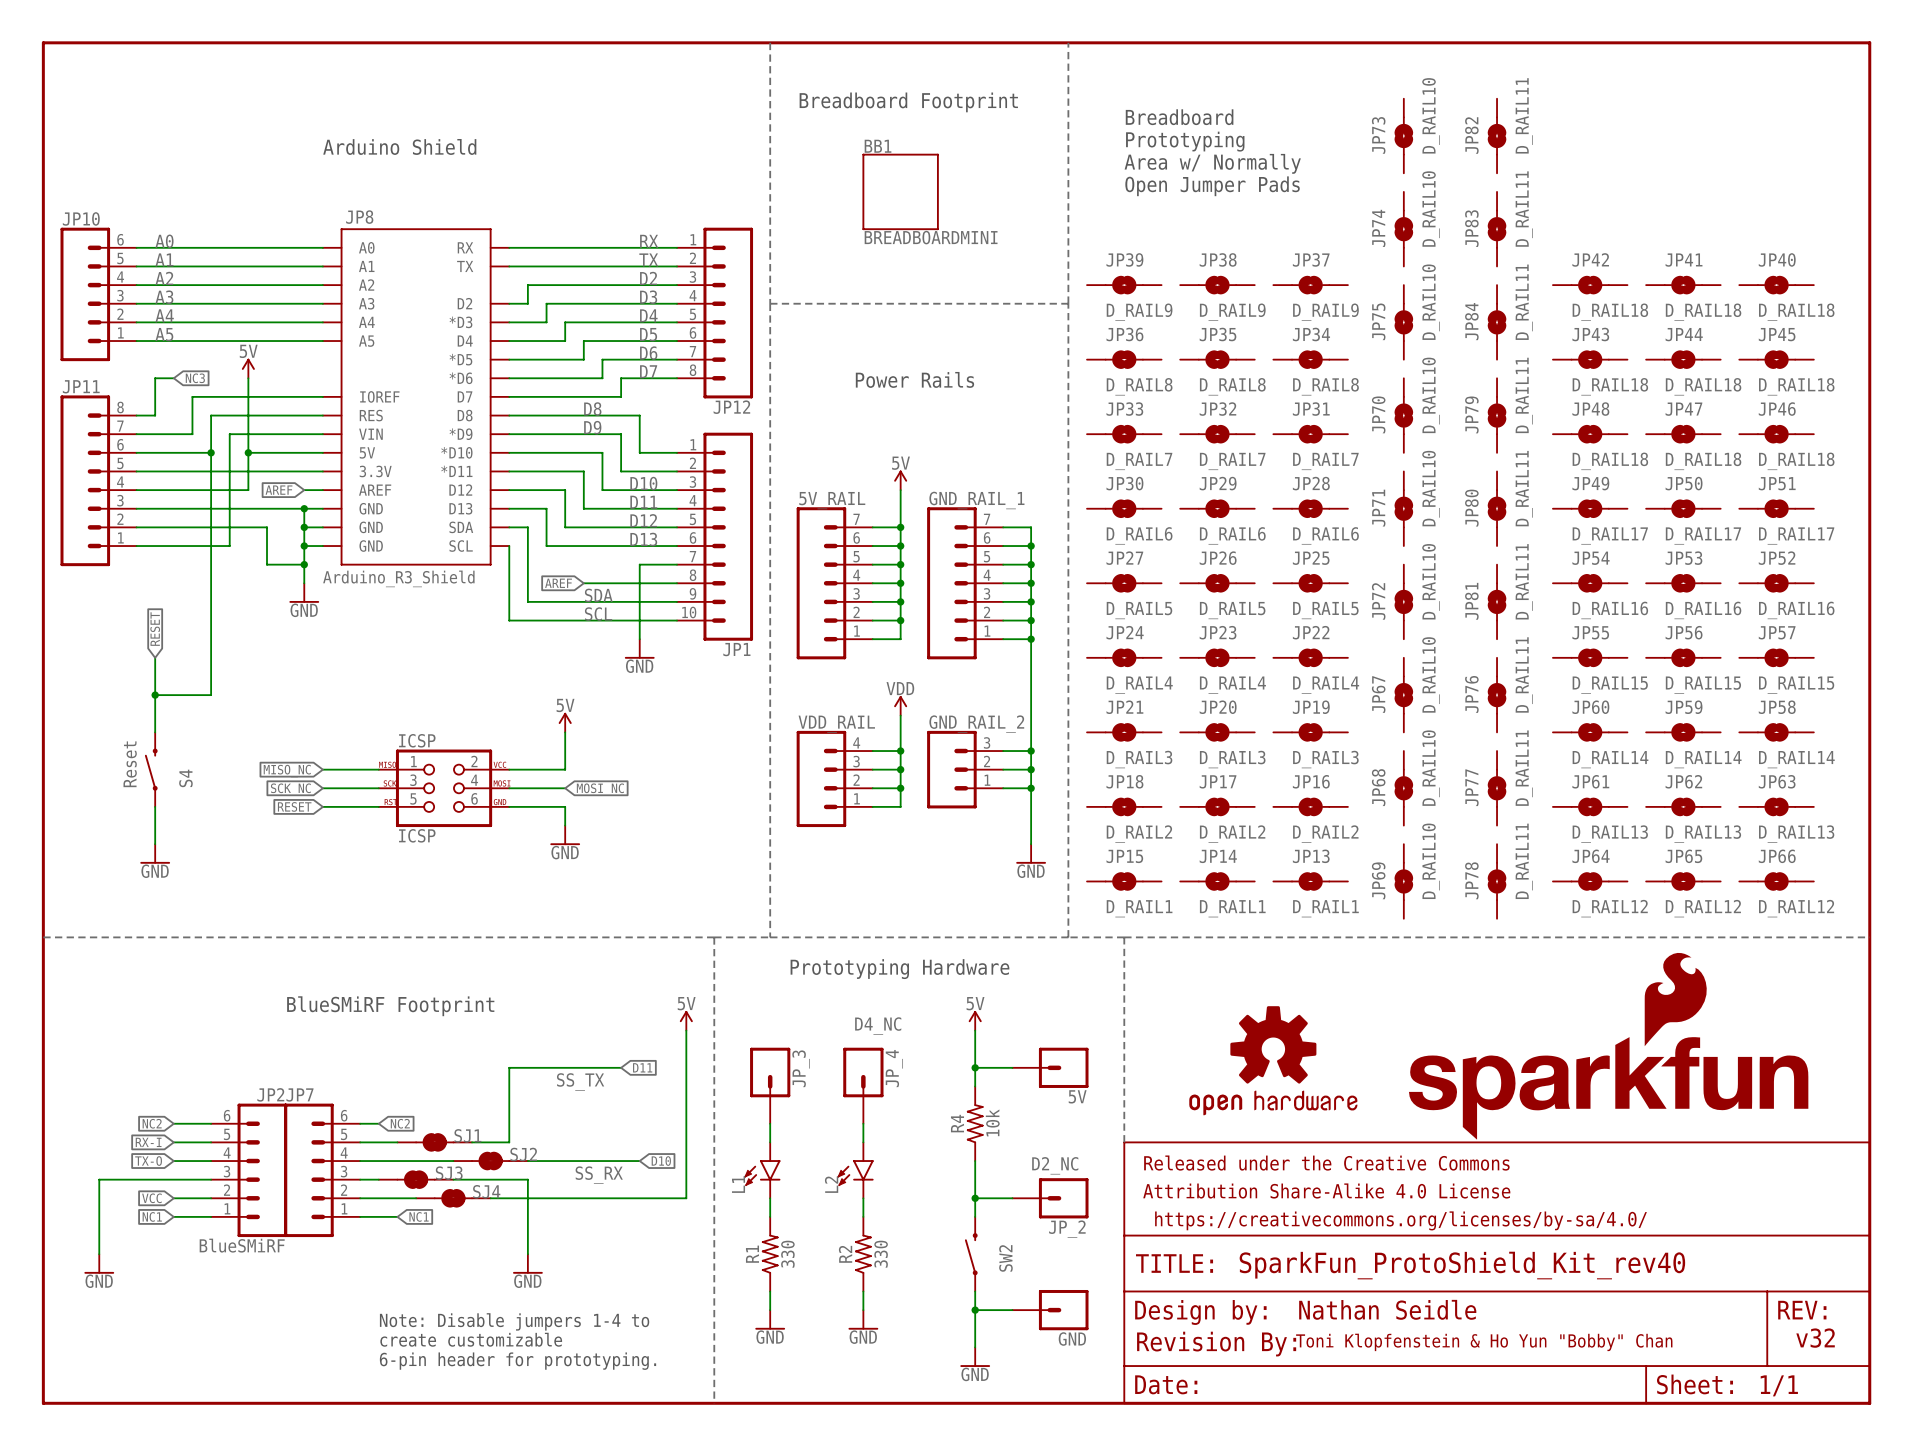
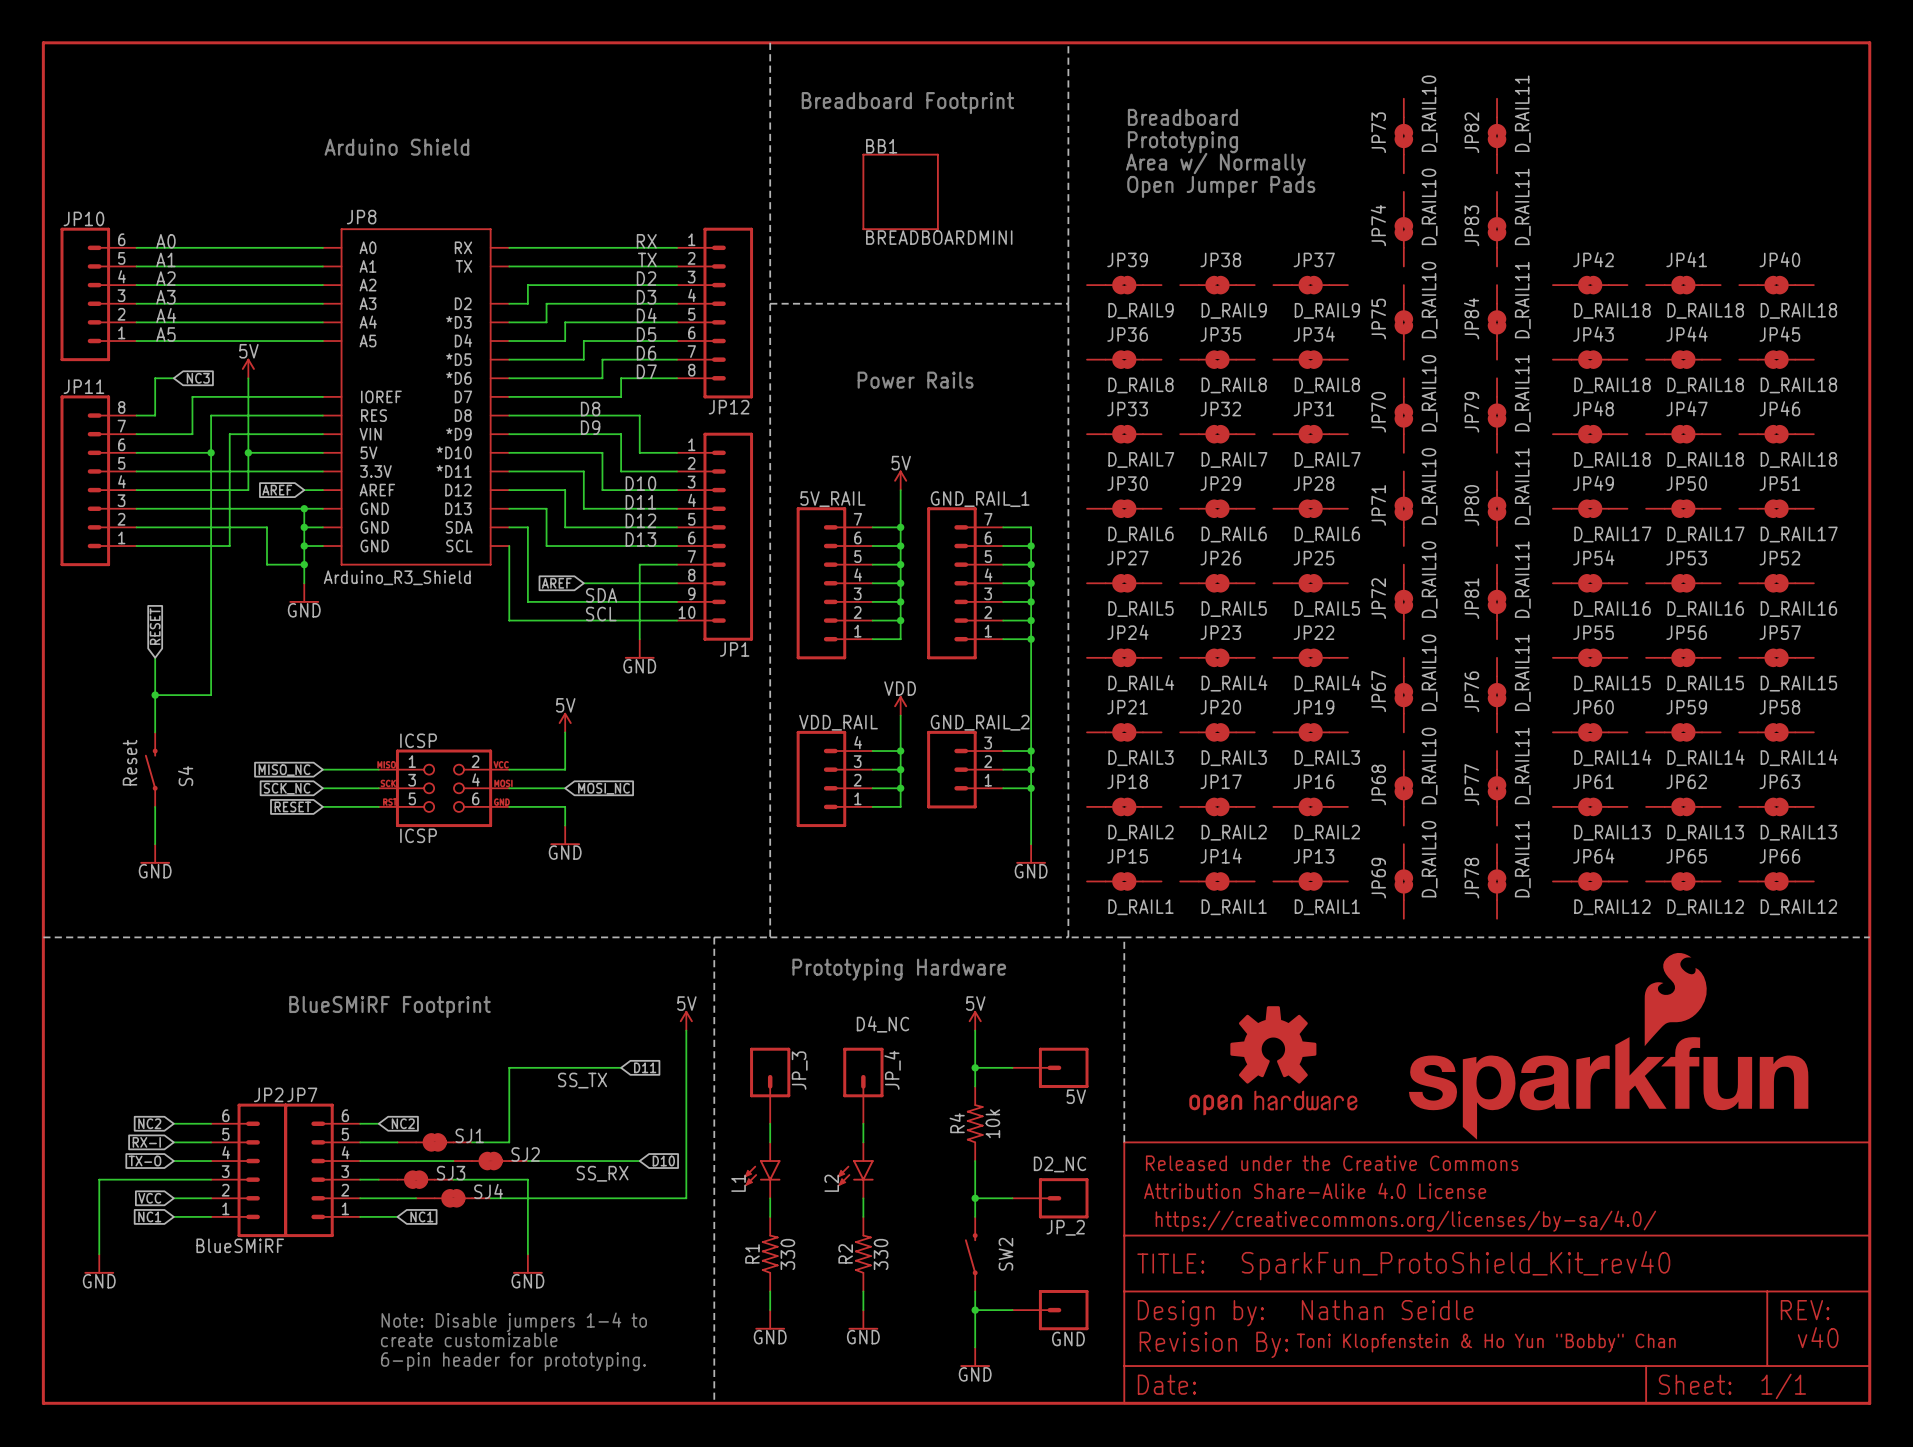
text: v32 (1815, 1338) -> v40 (1818, 1337)

